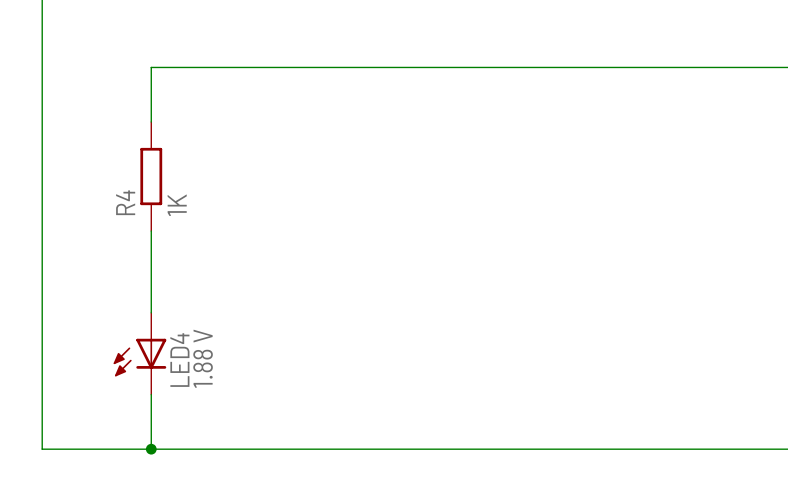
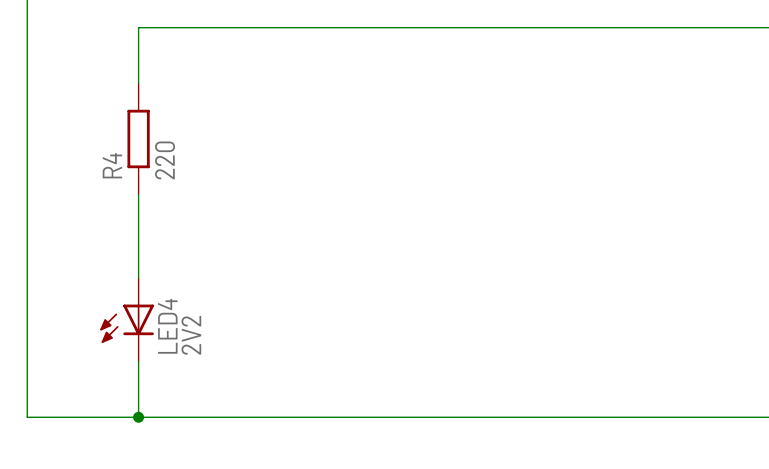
R4 value: 1K (177, 205) -> 220 (165, 160)
LED4 value: 1.88 V (203, 358) -> 2V2 (191, 335)

